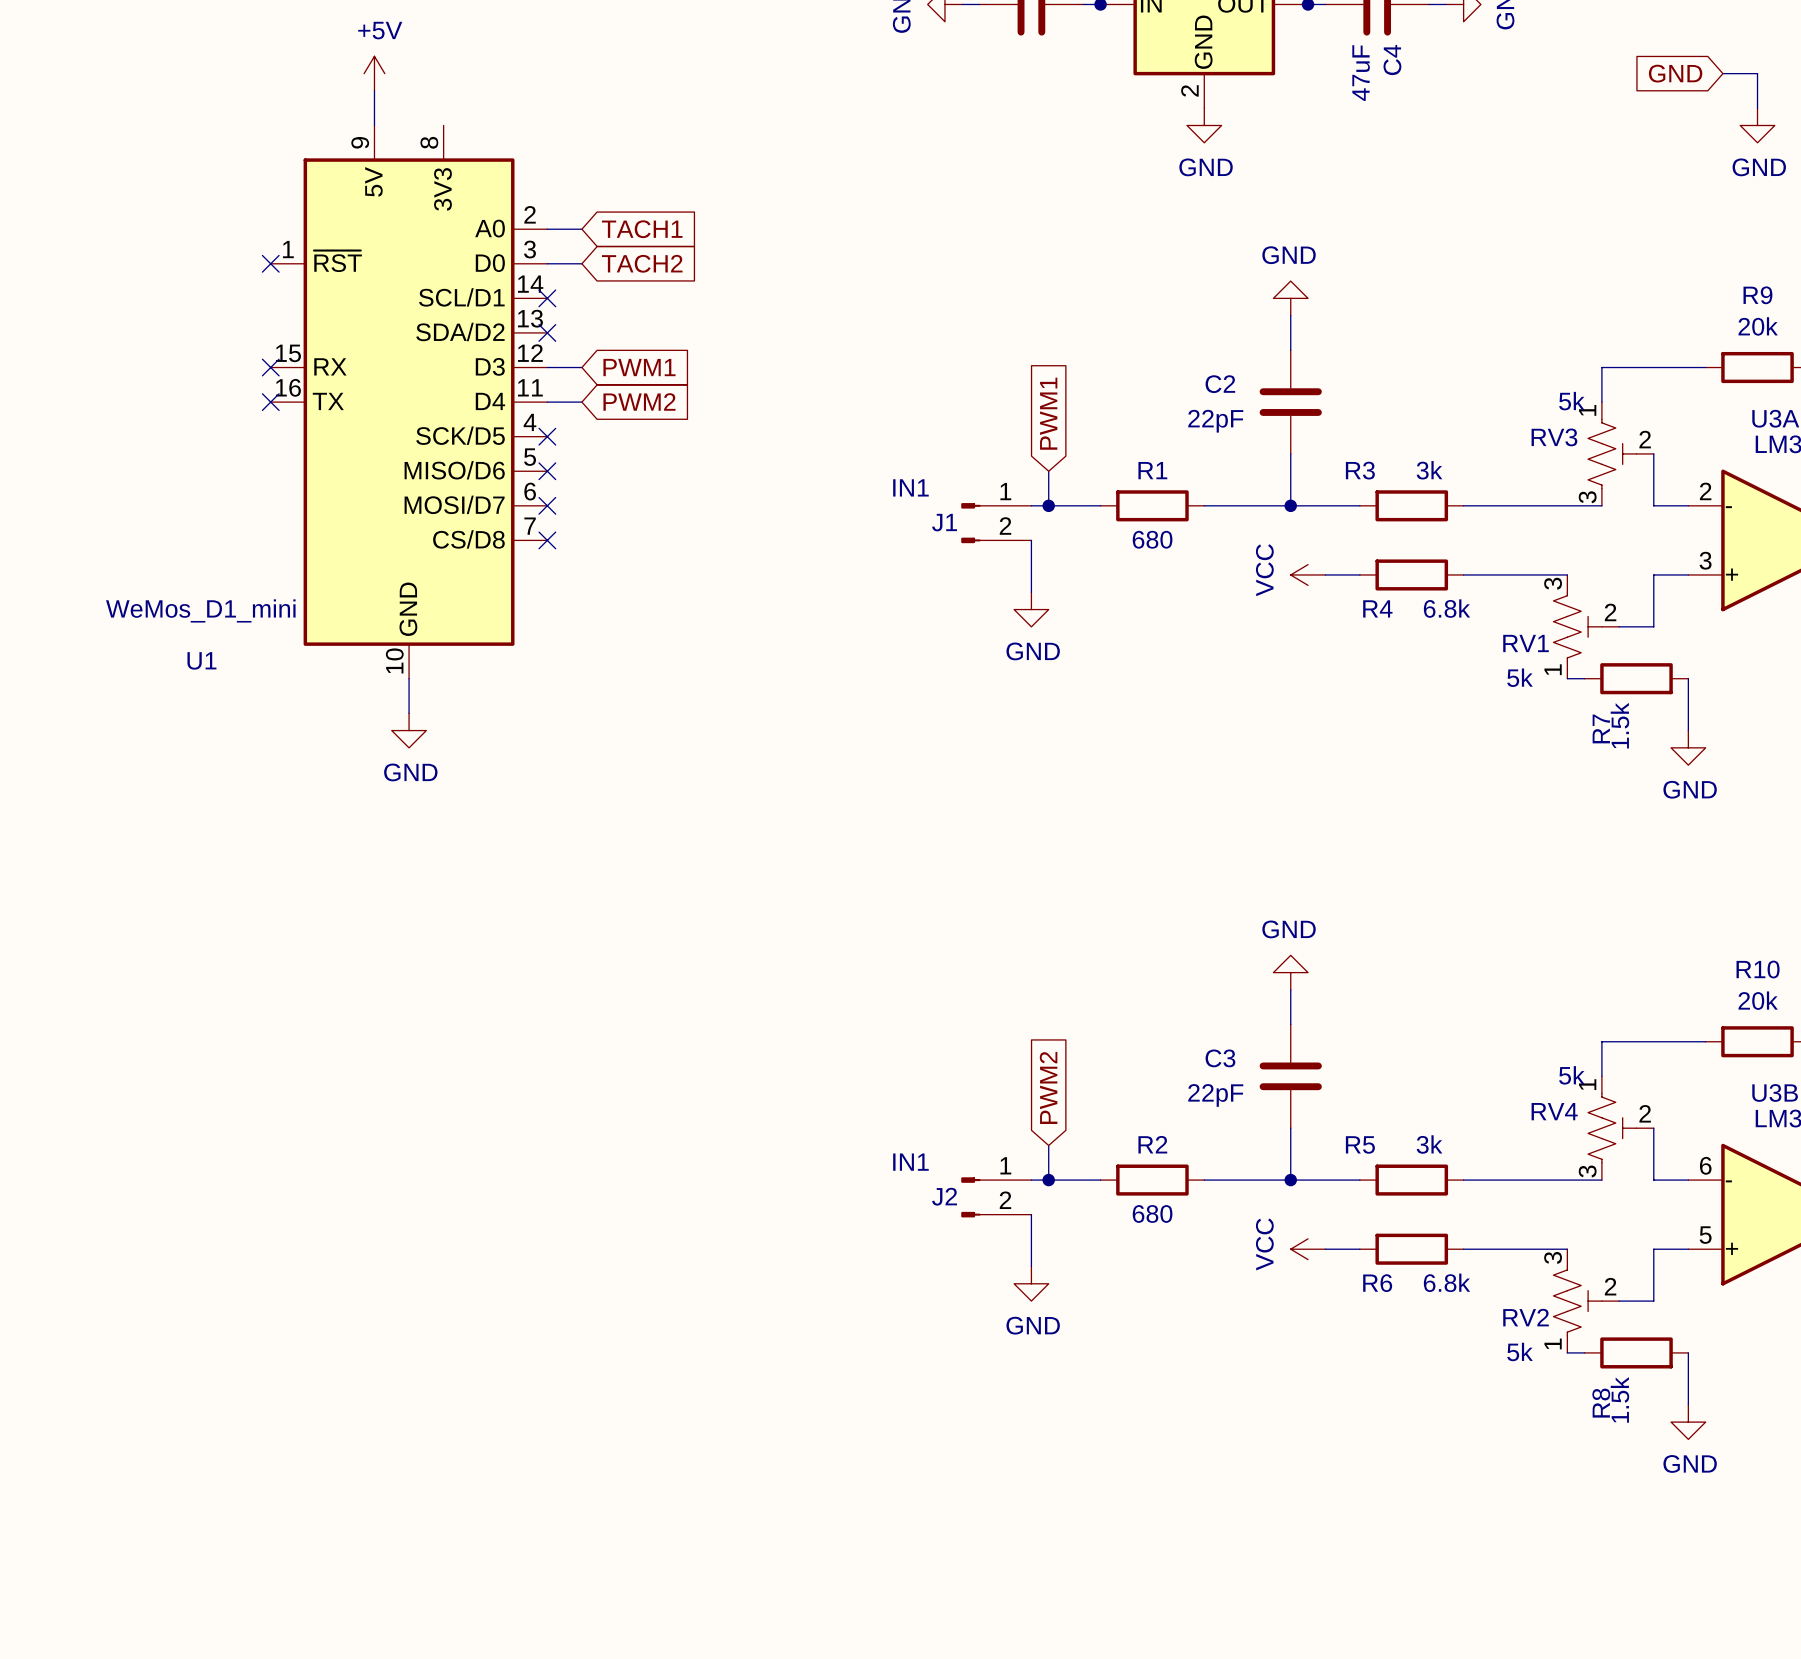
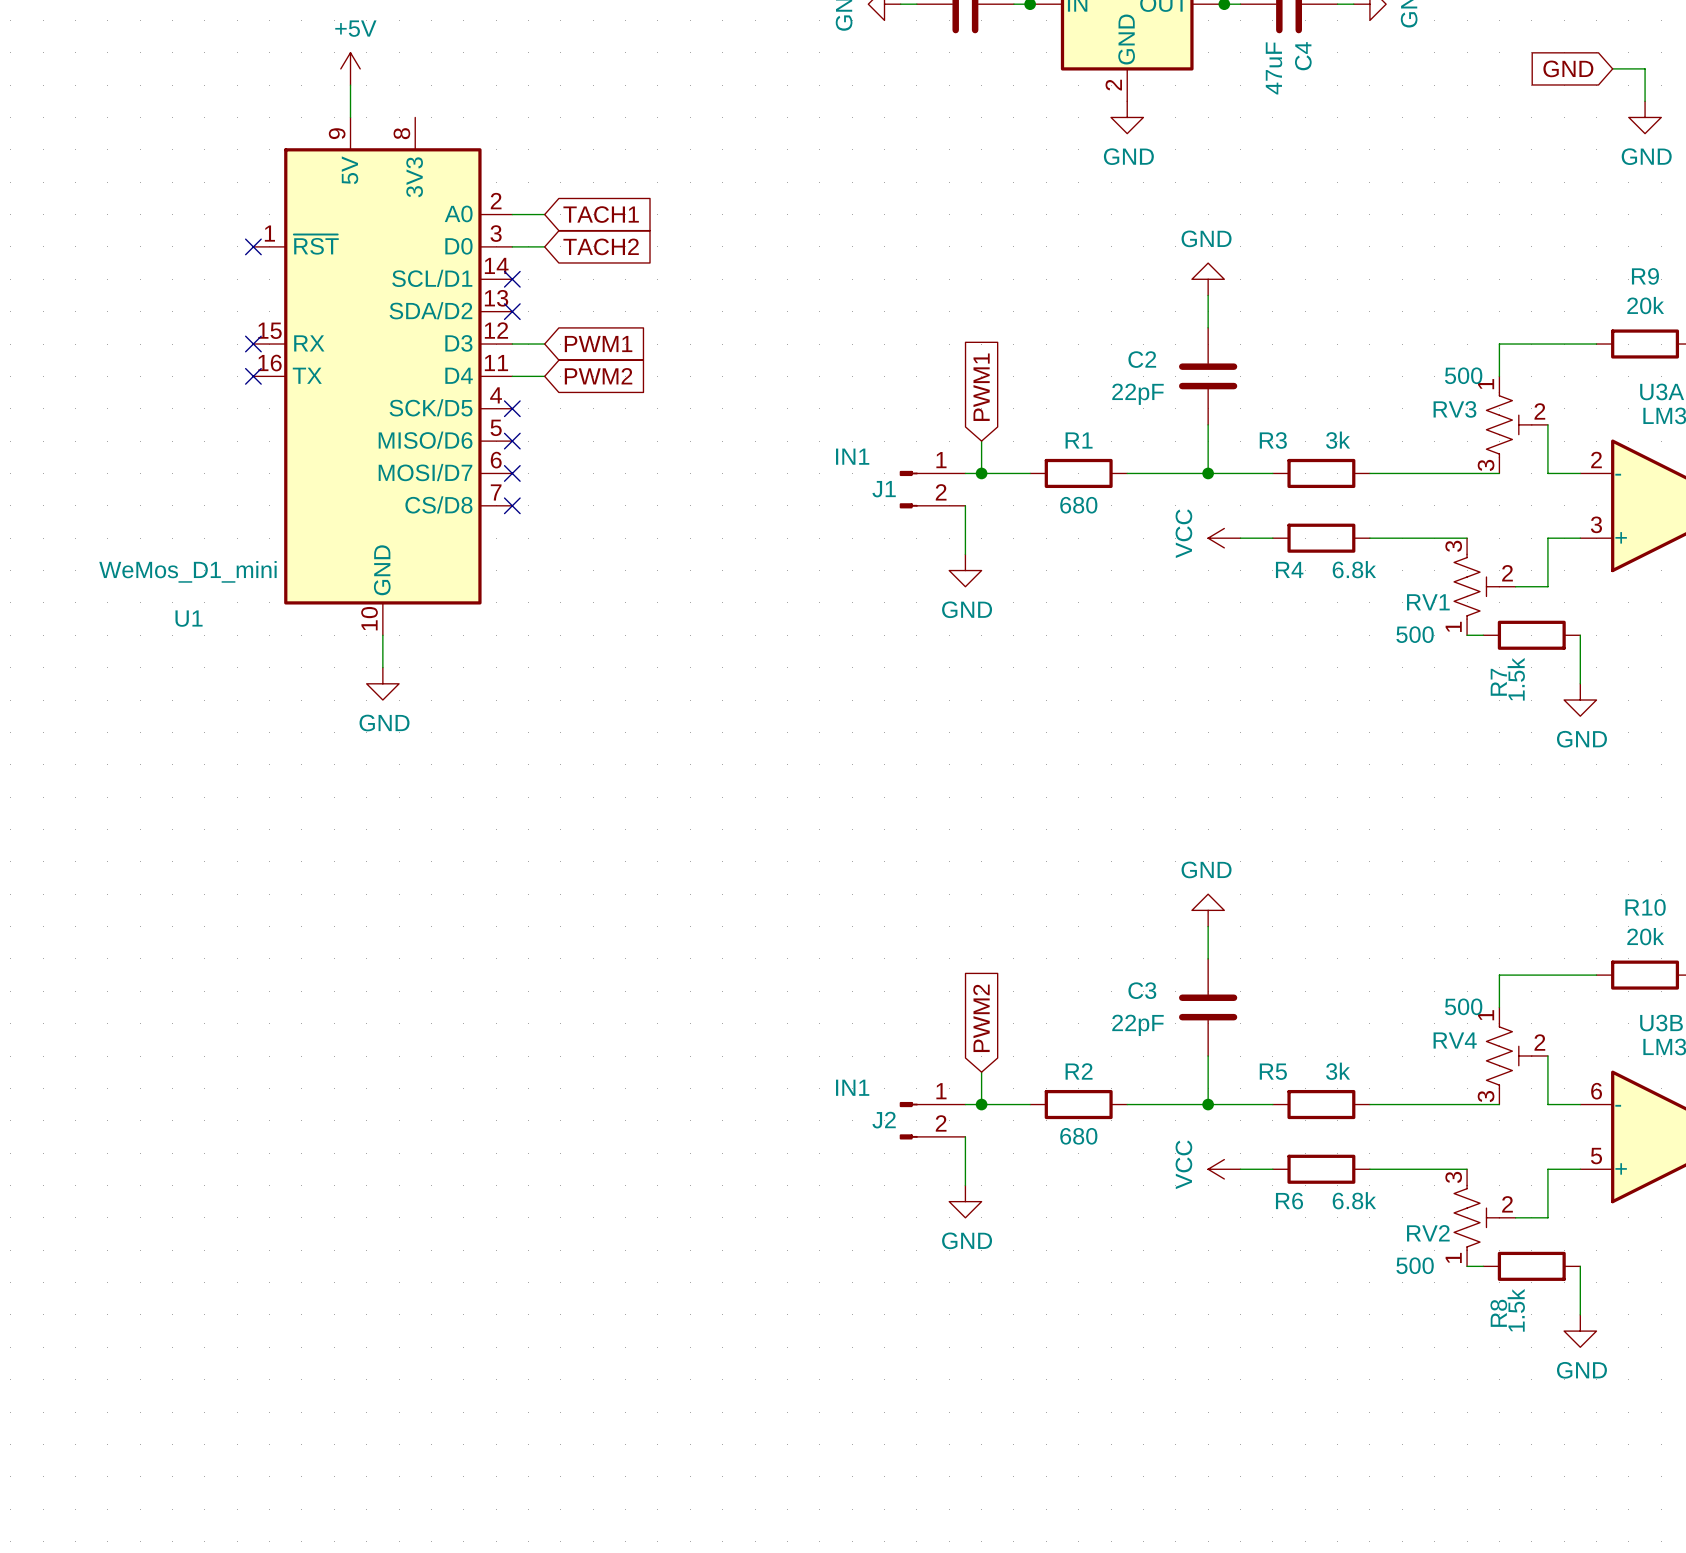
RV3 value: 5k (1571, 401) -> 500 (1463, 375)
RV1 value: 5k (1520, 677) -> 500 (1415, 634)
RV4 value: 5k (1571, 1075) -> 500 (1463, 1006)
RV2 value: 5k (1520, 1351) -> 500 (1415, 1265)

